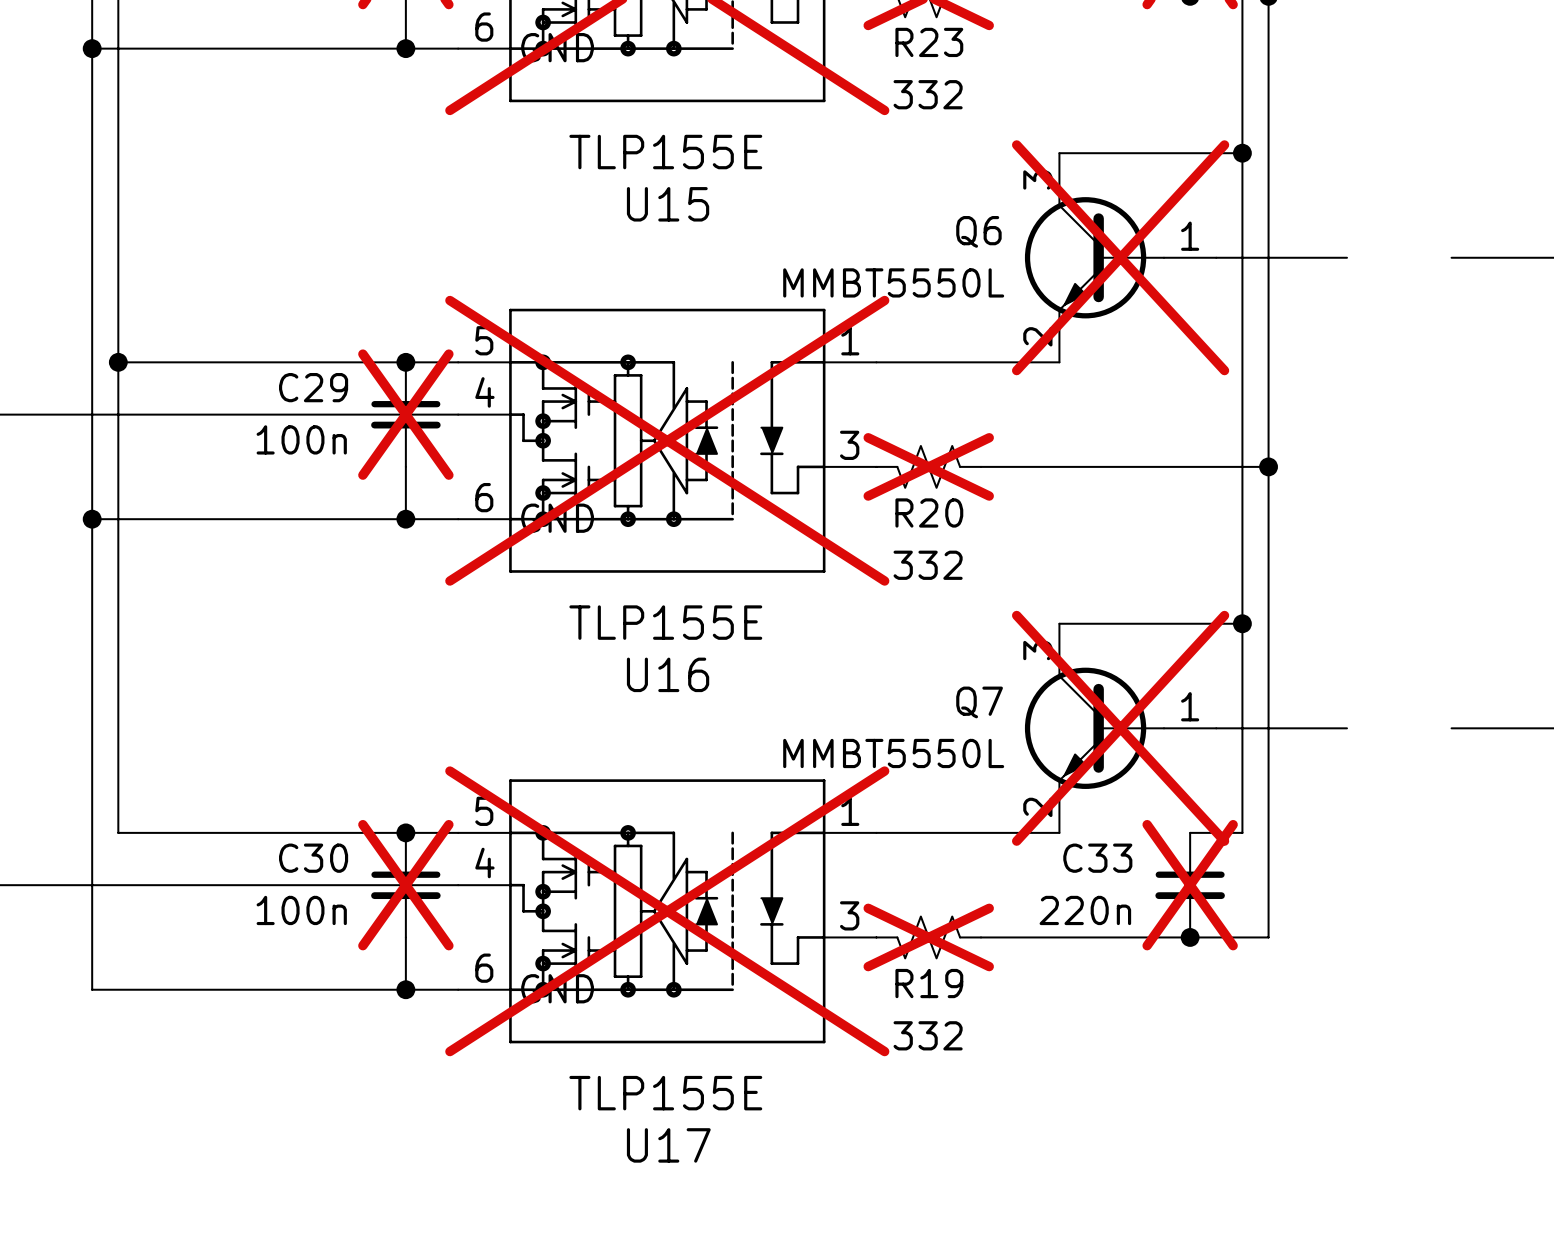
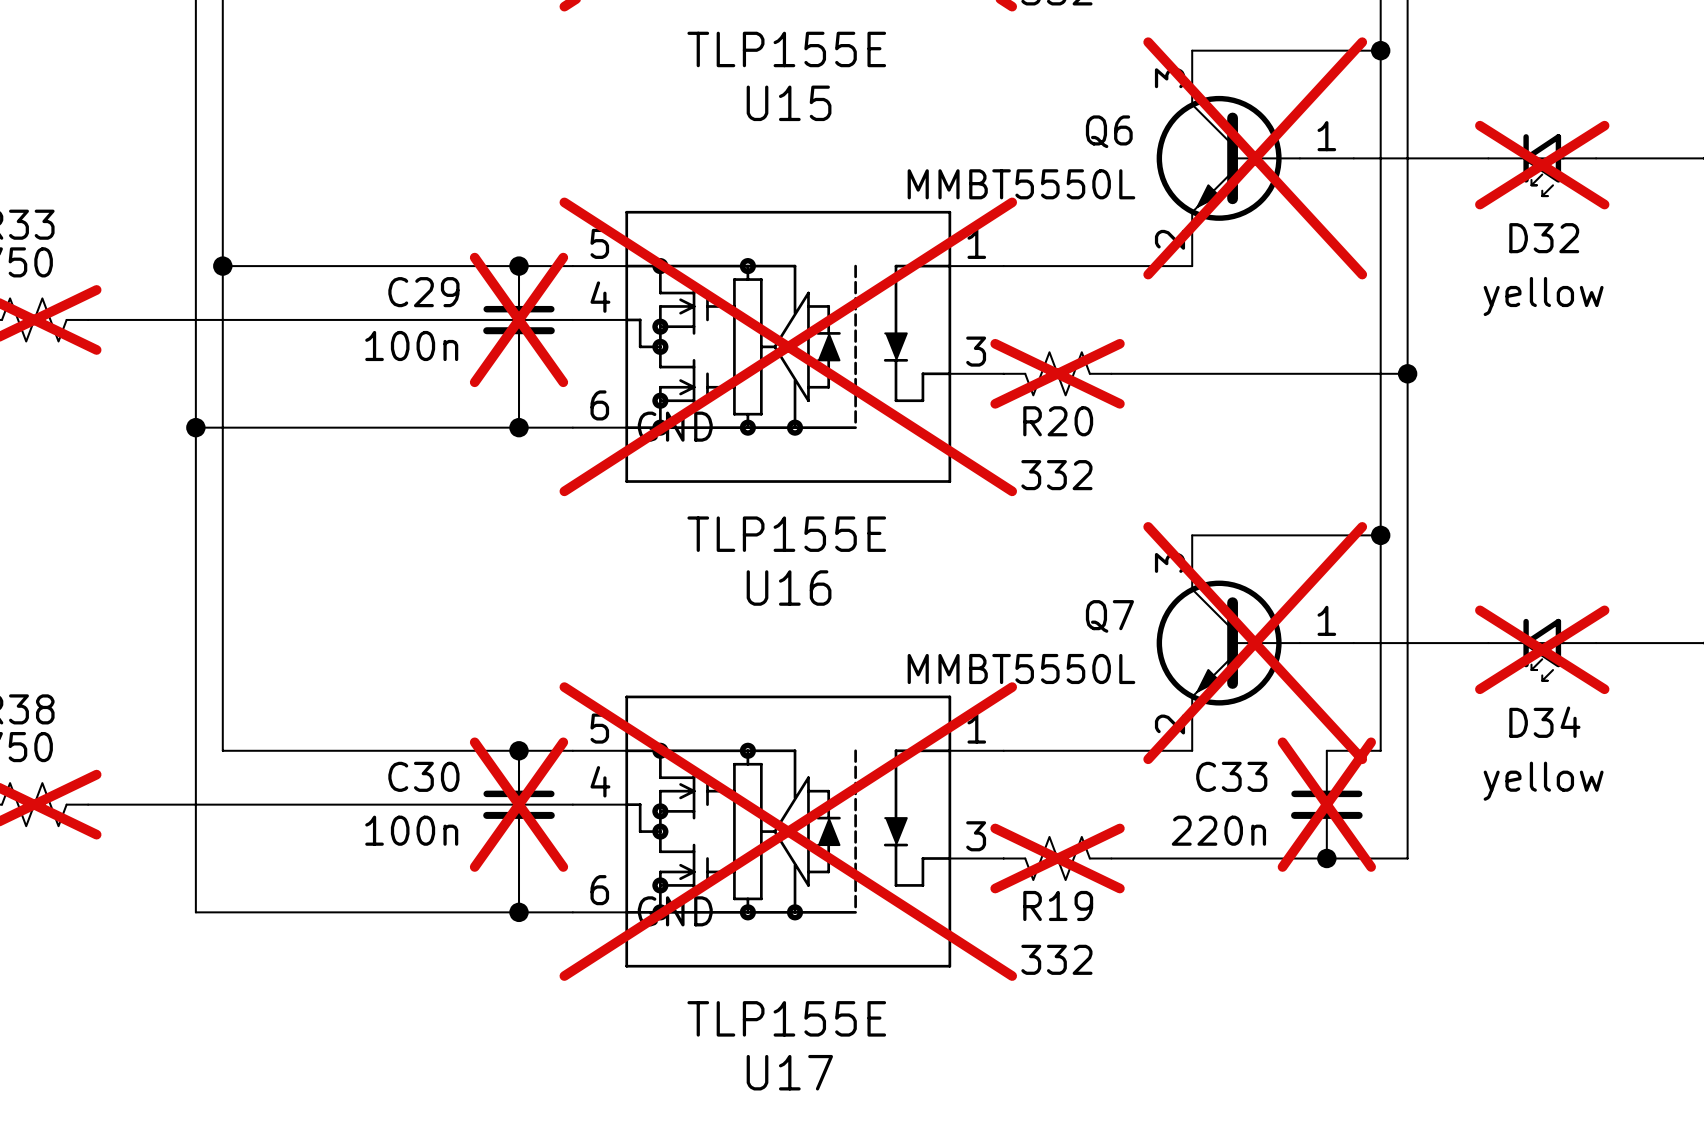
D32: none -> yellow (1542, 165)
D34: none -> yellow (1542, 649)

